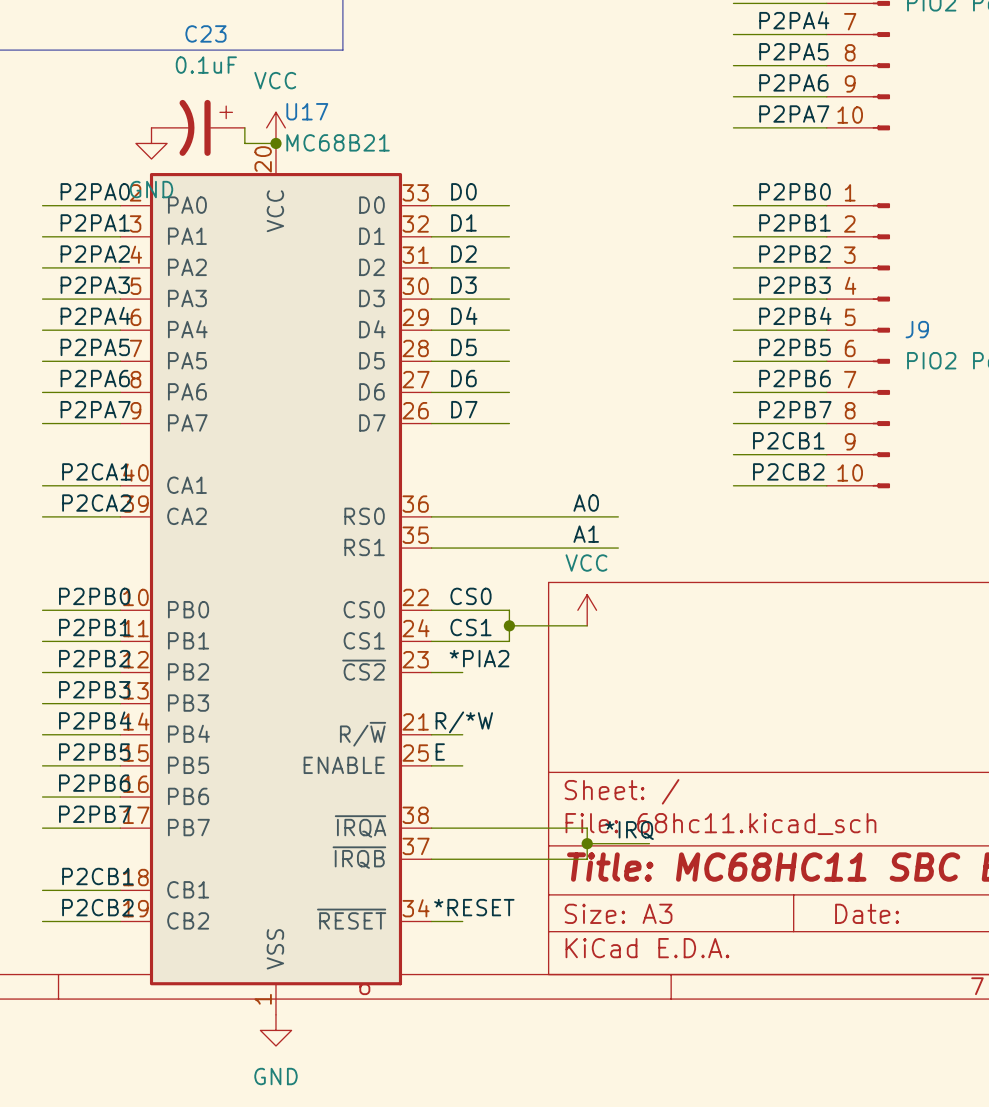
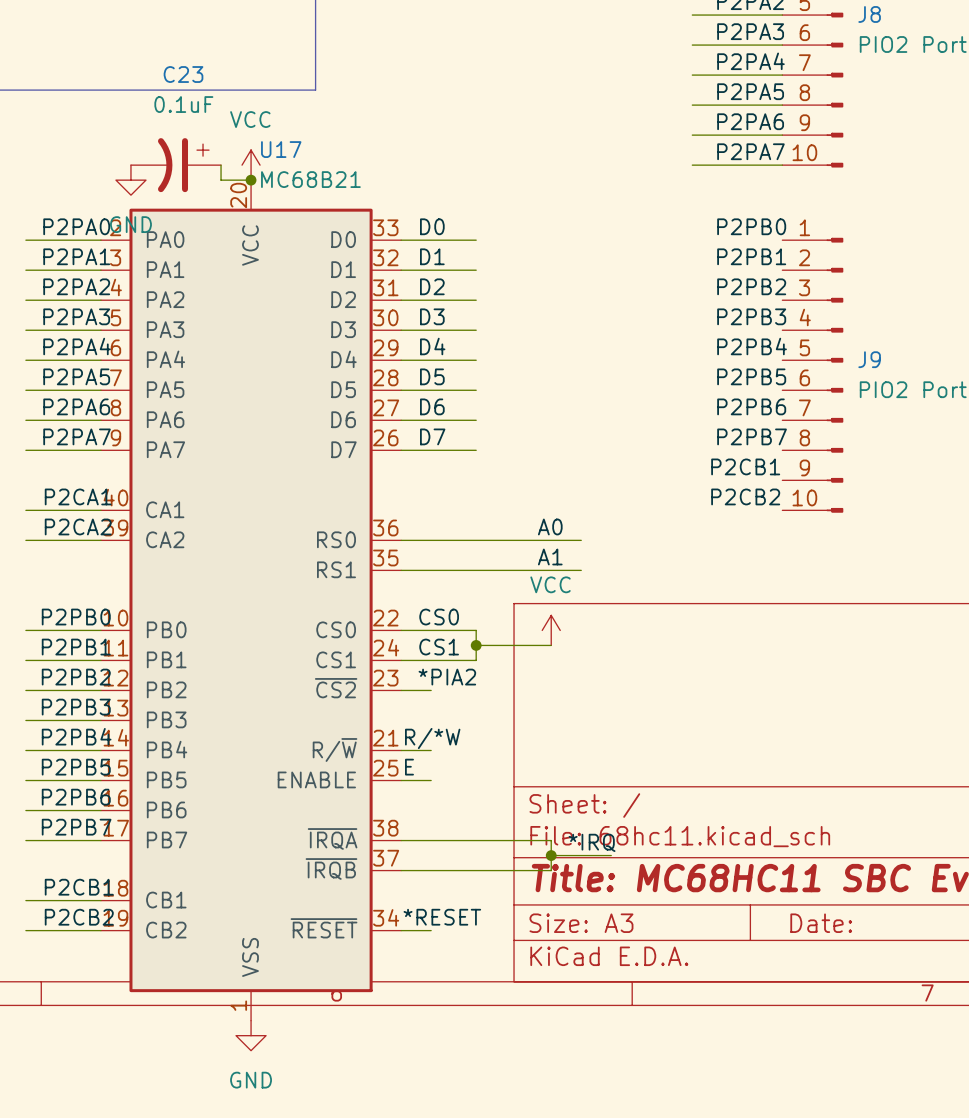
wire: (733, 205) (826, 205) -> none
wire: (733, 236) (826, 236) -> none
wire: (733, 267) (826, 267) -> none
wire: (733, 299) (826, 299) -> none
wire: (733, 330) (826, 330) -> none
wire: (733, 361) (826, 361) -> none
wire: (733, 392) (826, 392) -> none
wire: (733, 423) (826, 423) -> none
wire: (733, 454) (826, 454) -> none
wire: (733, 485) (826, 485) -> none

